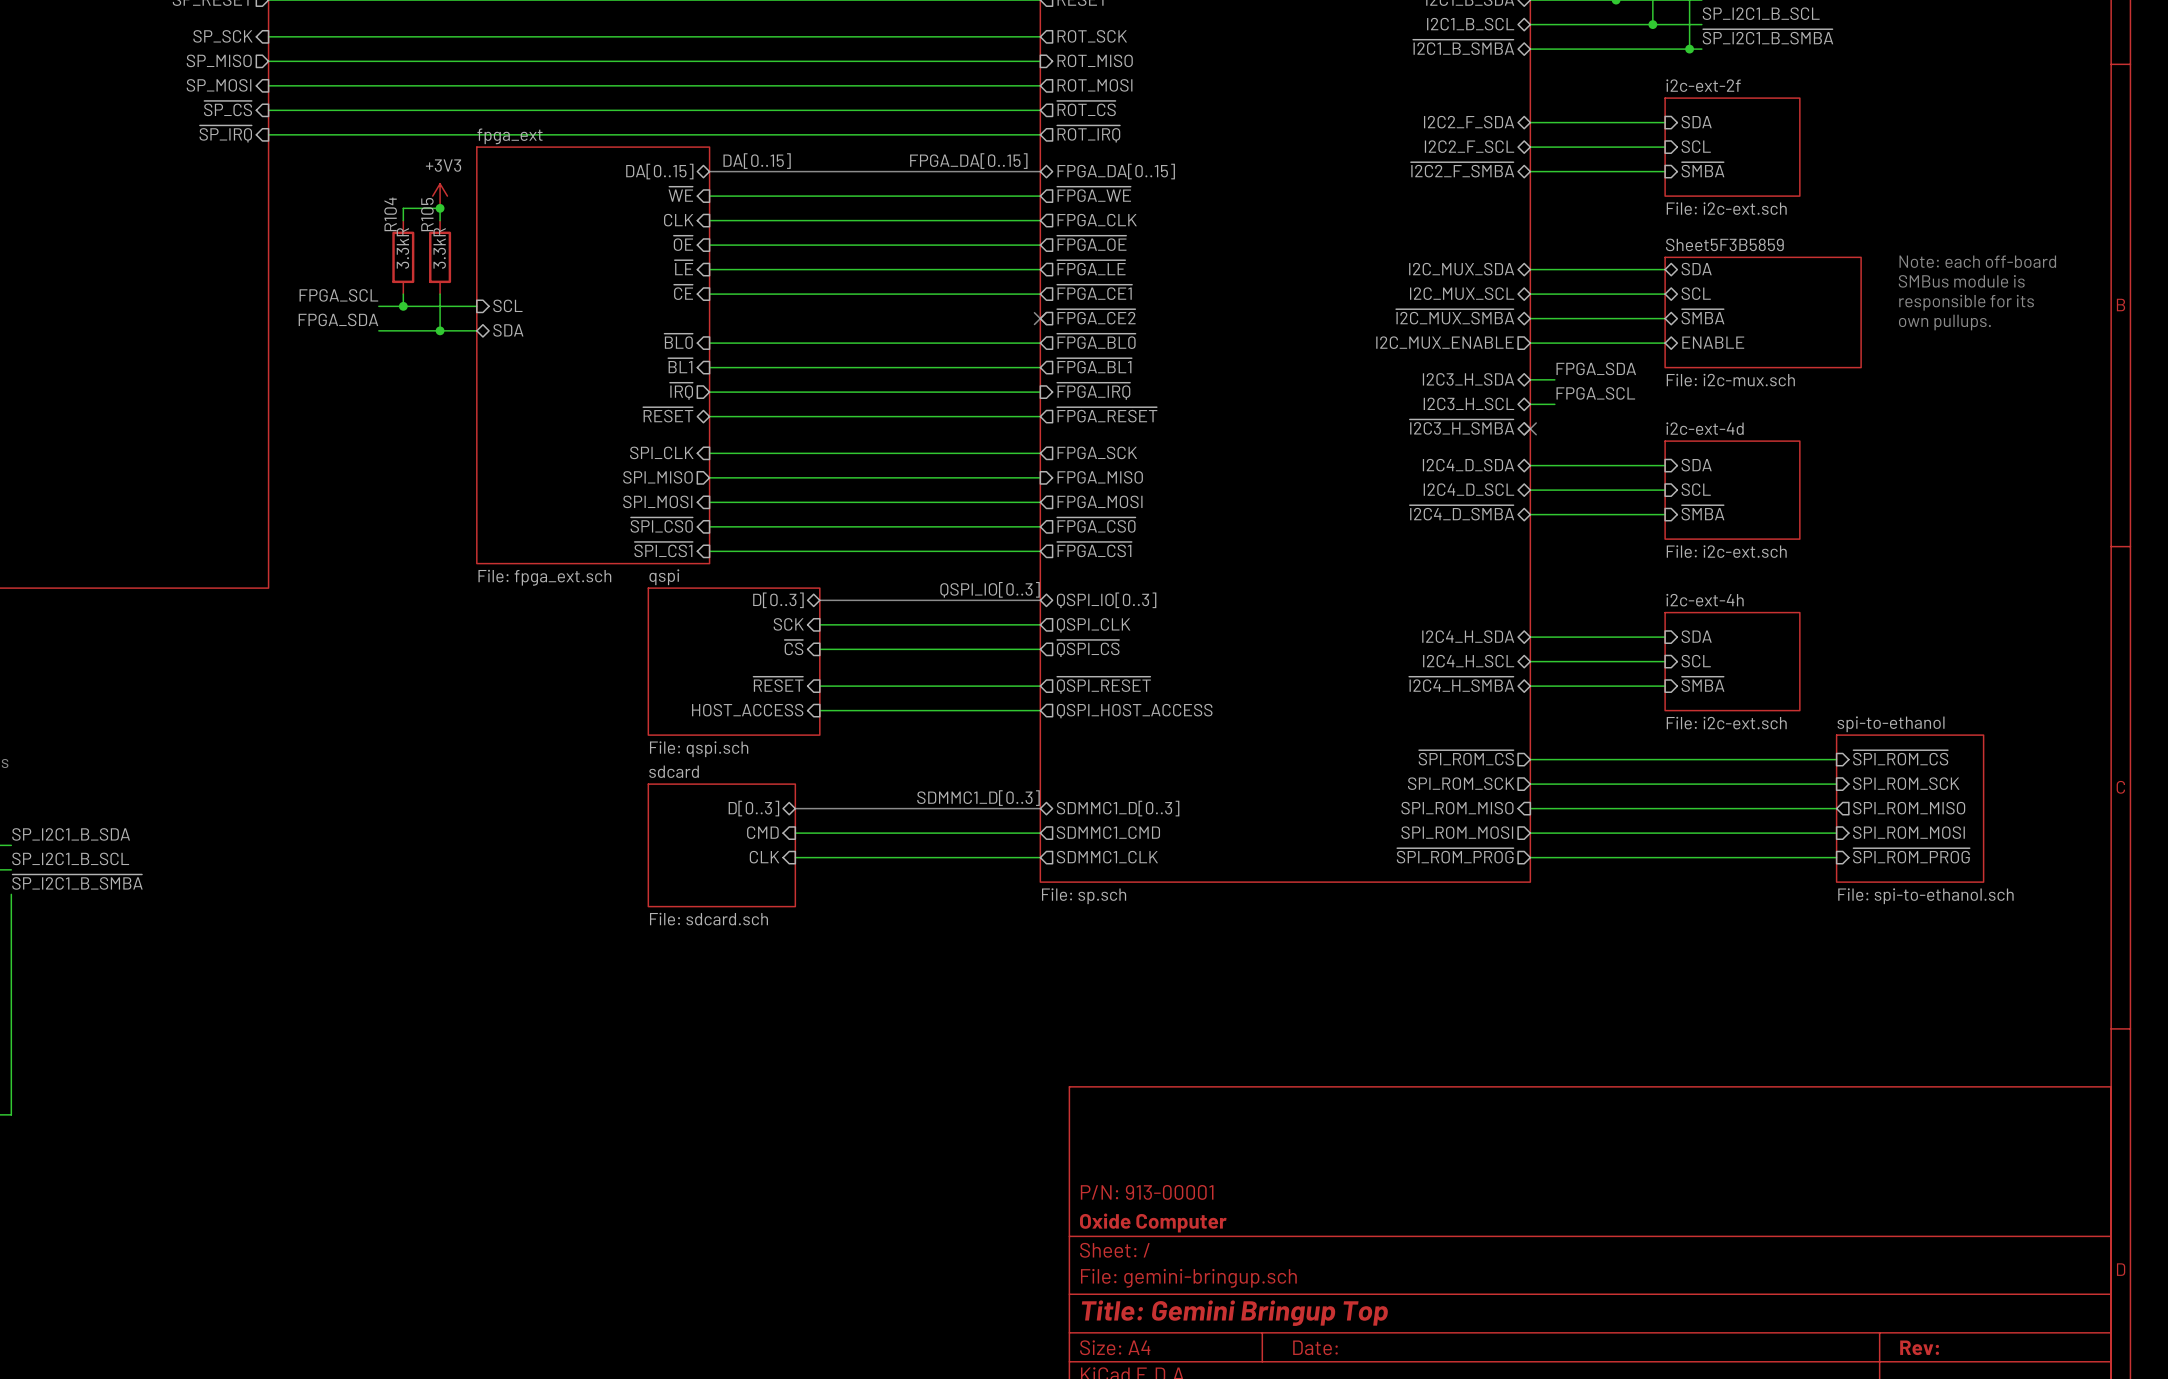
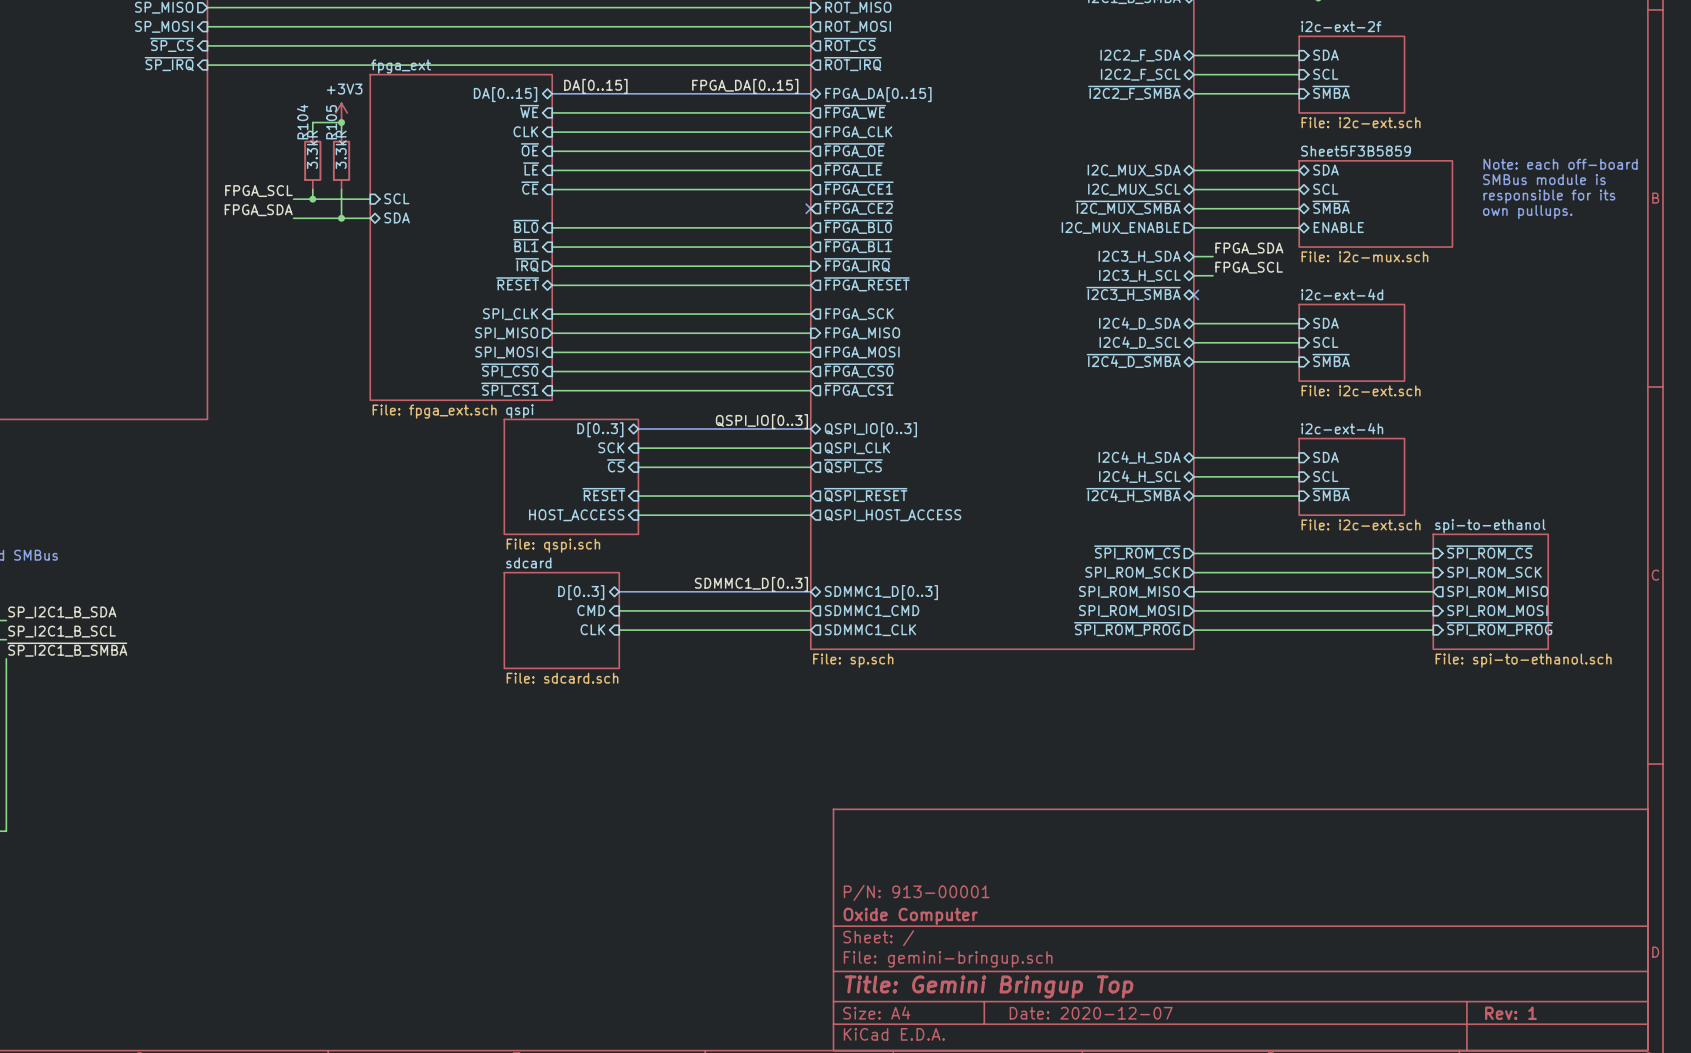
title block: Date: (1315, 1347) -> Date: 2020-12-07 (1091, 1013)
title block: Rev: (1919, 1347) -> Rev: 1 (1510, 1013)

